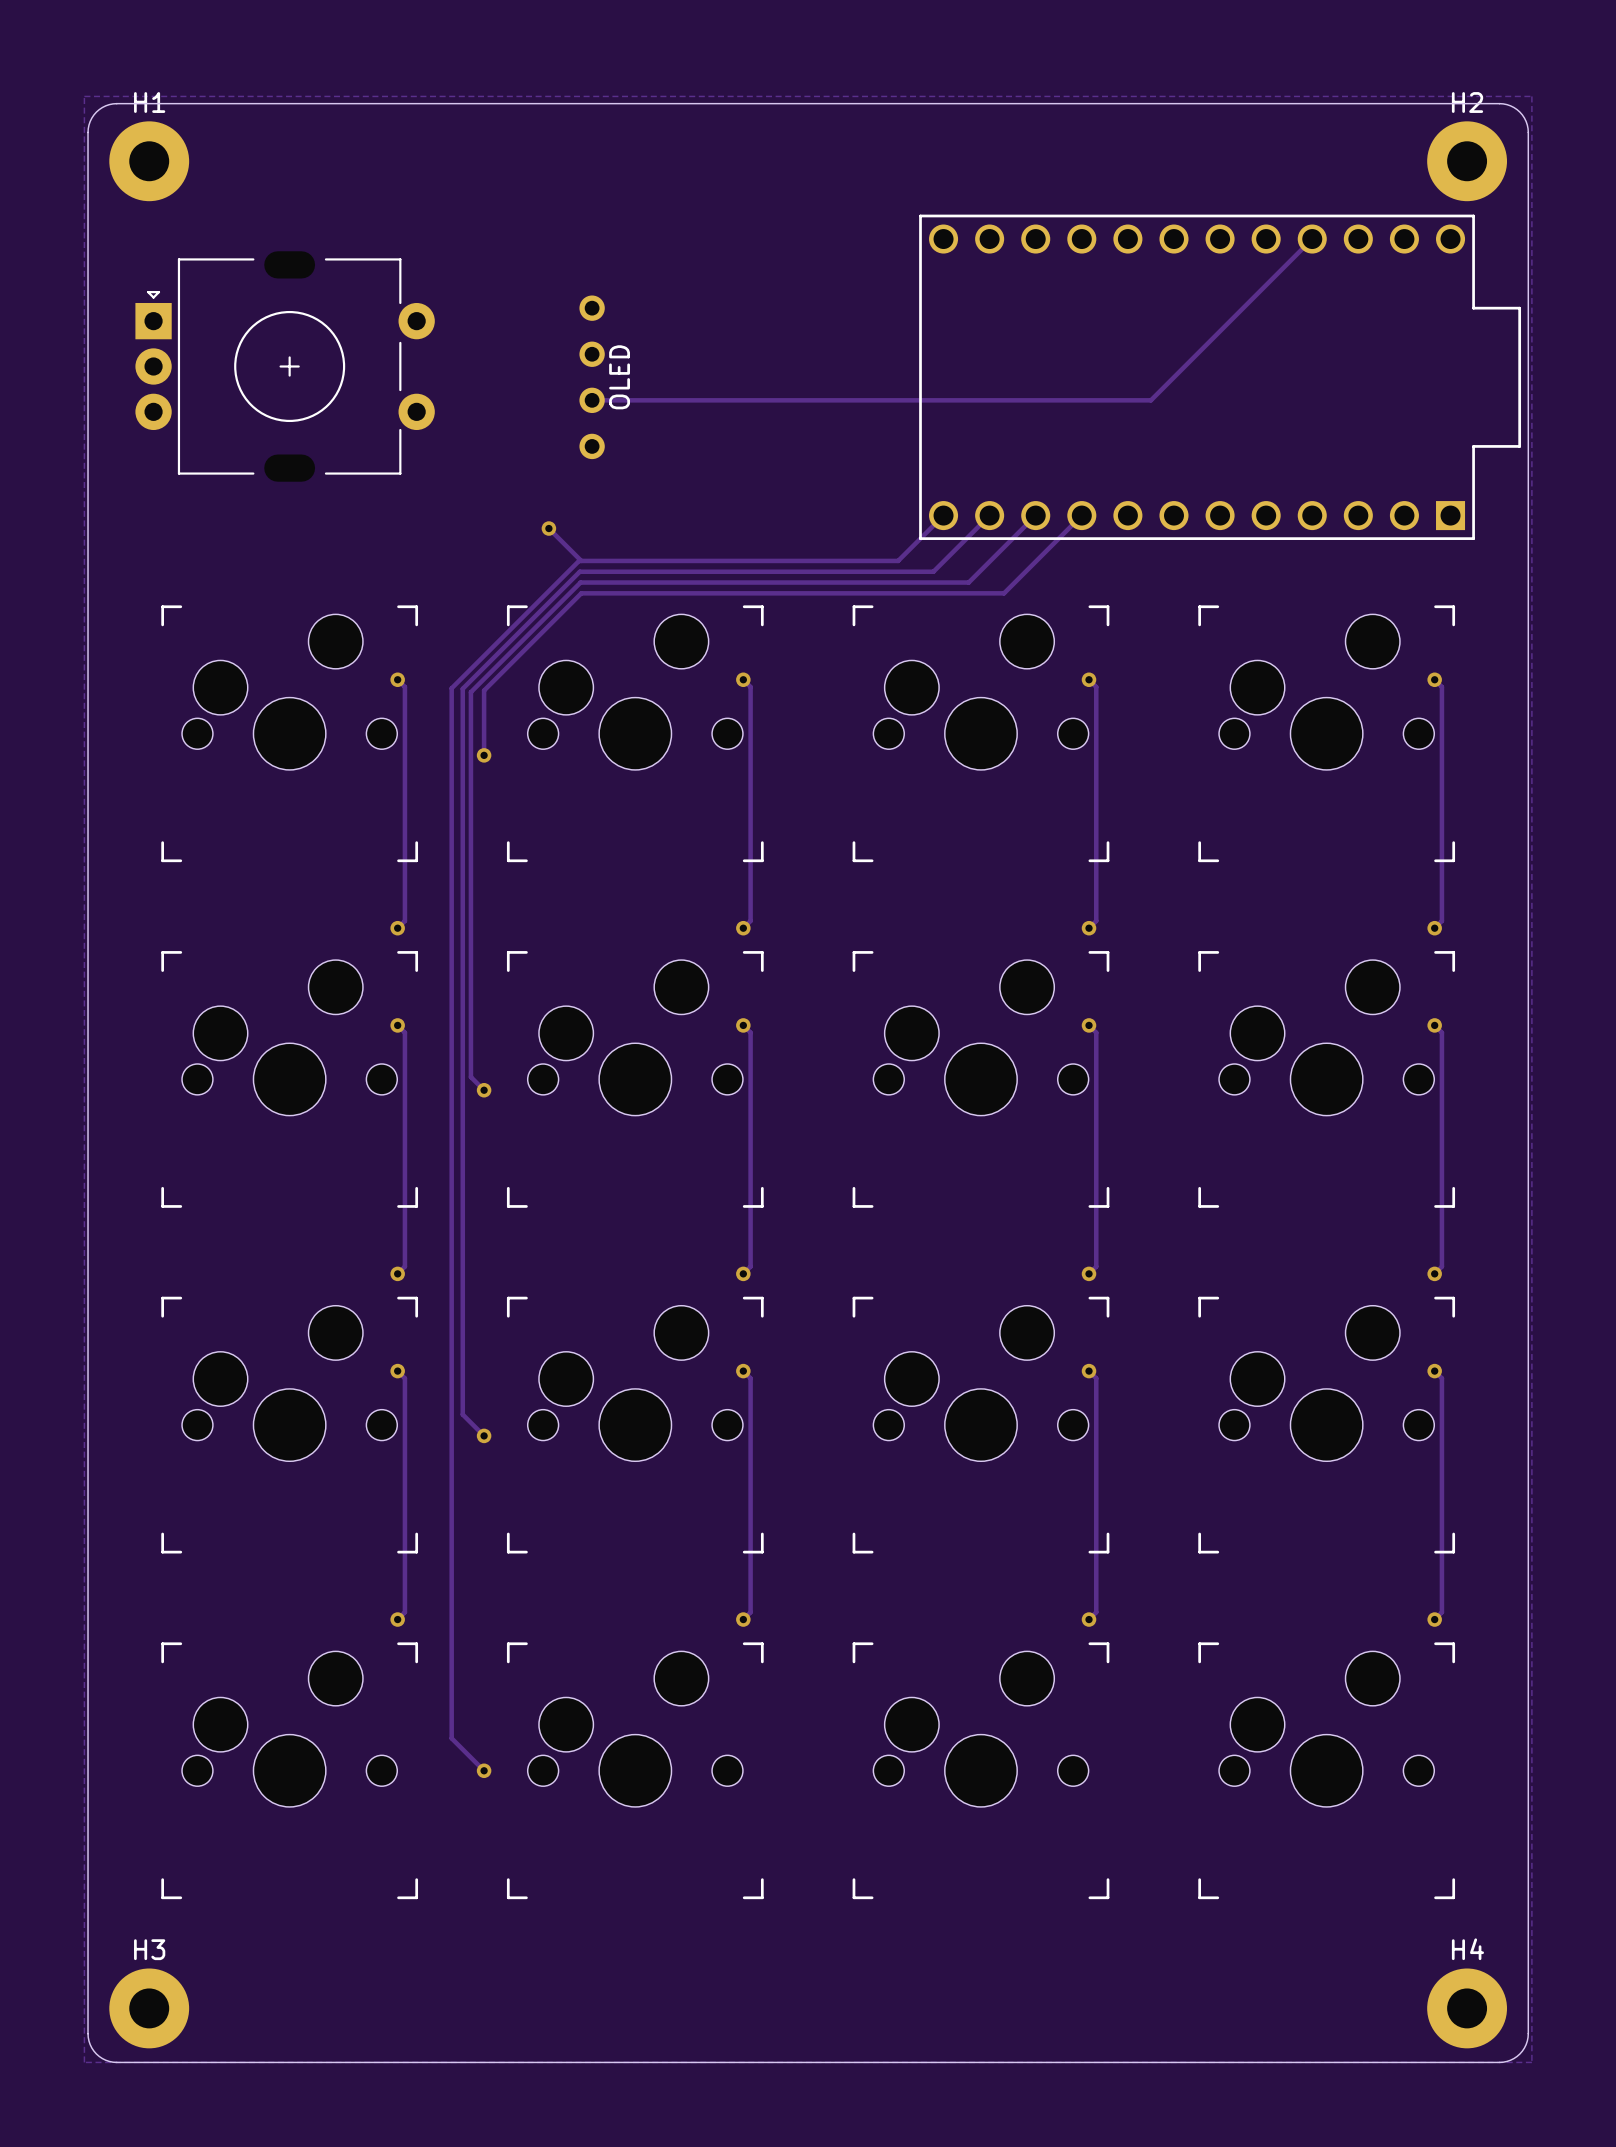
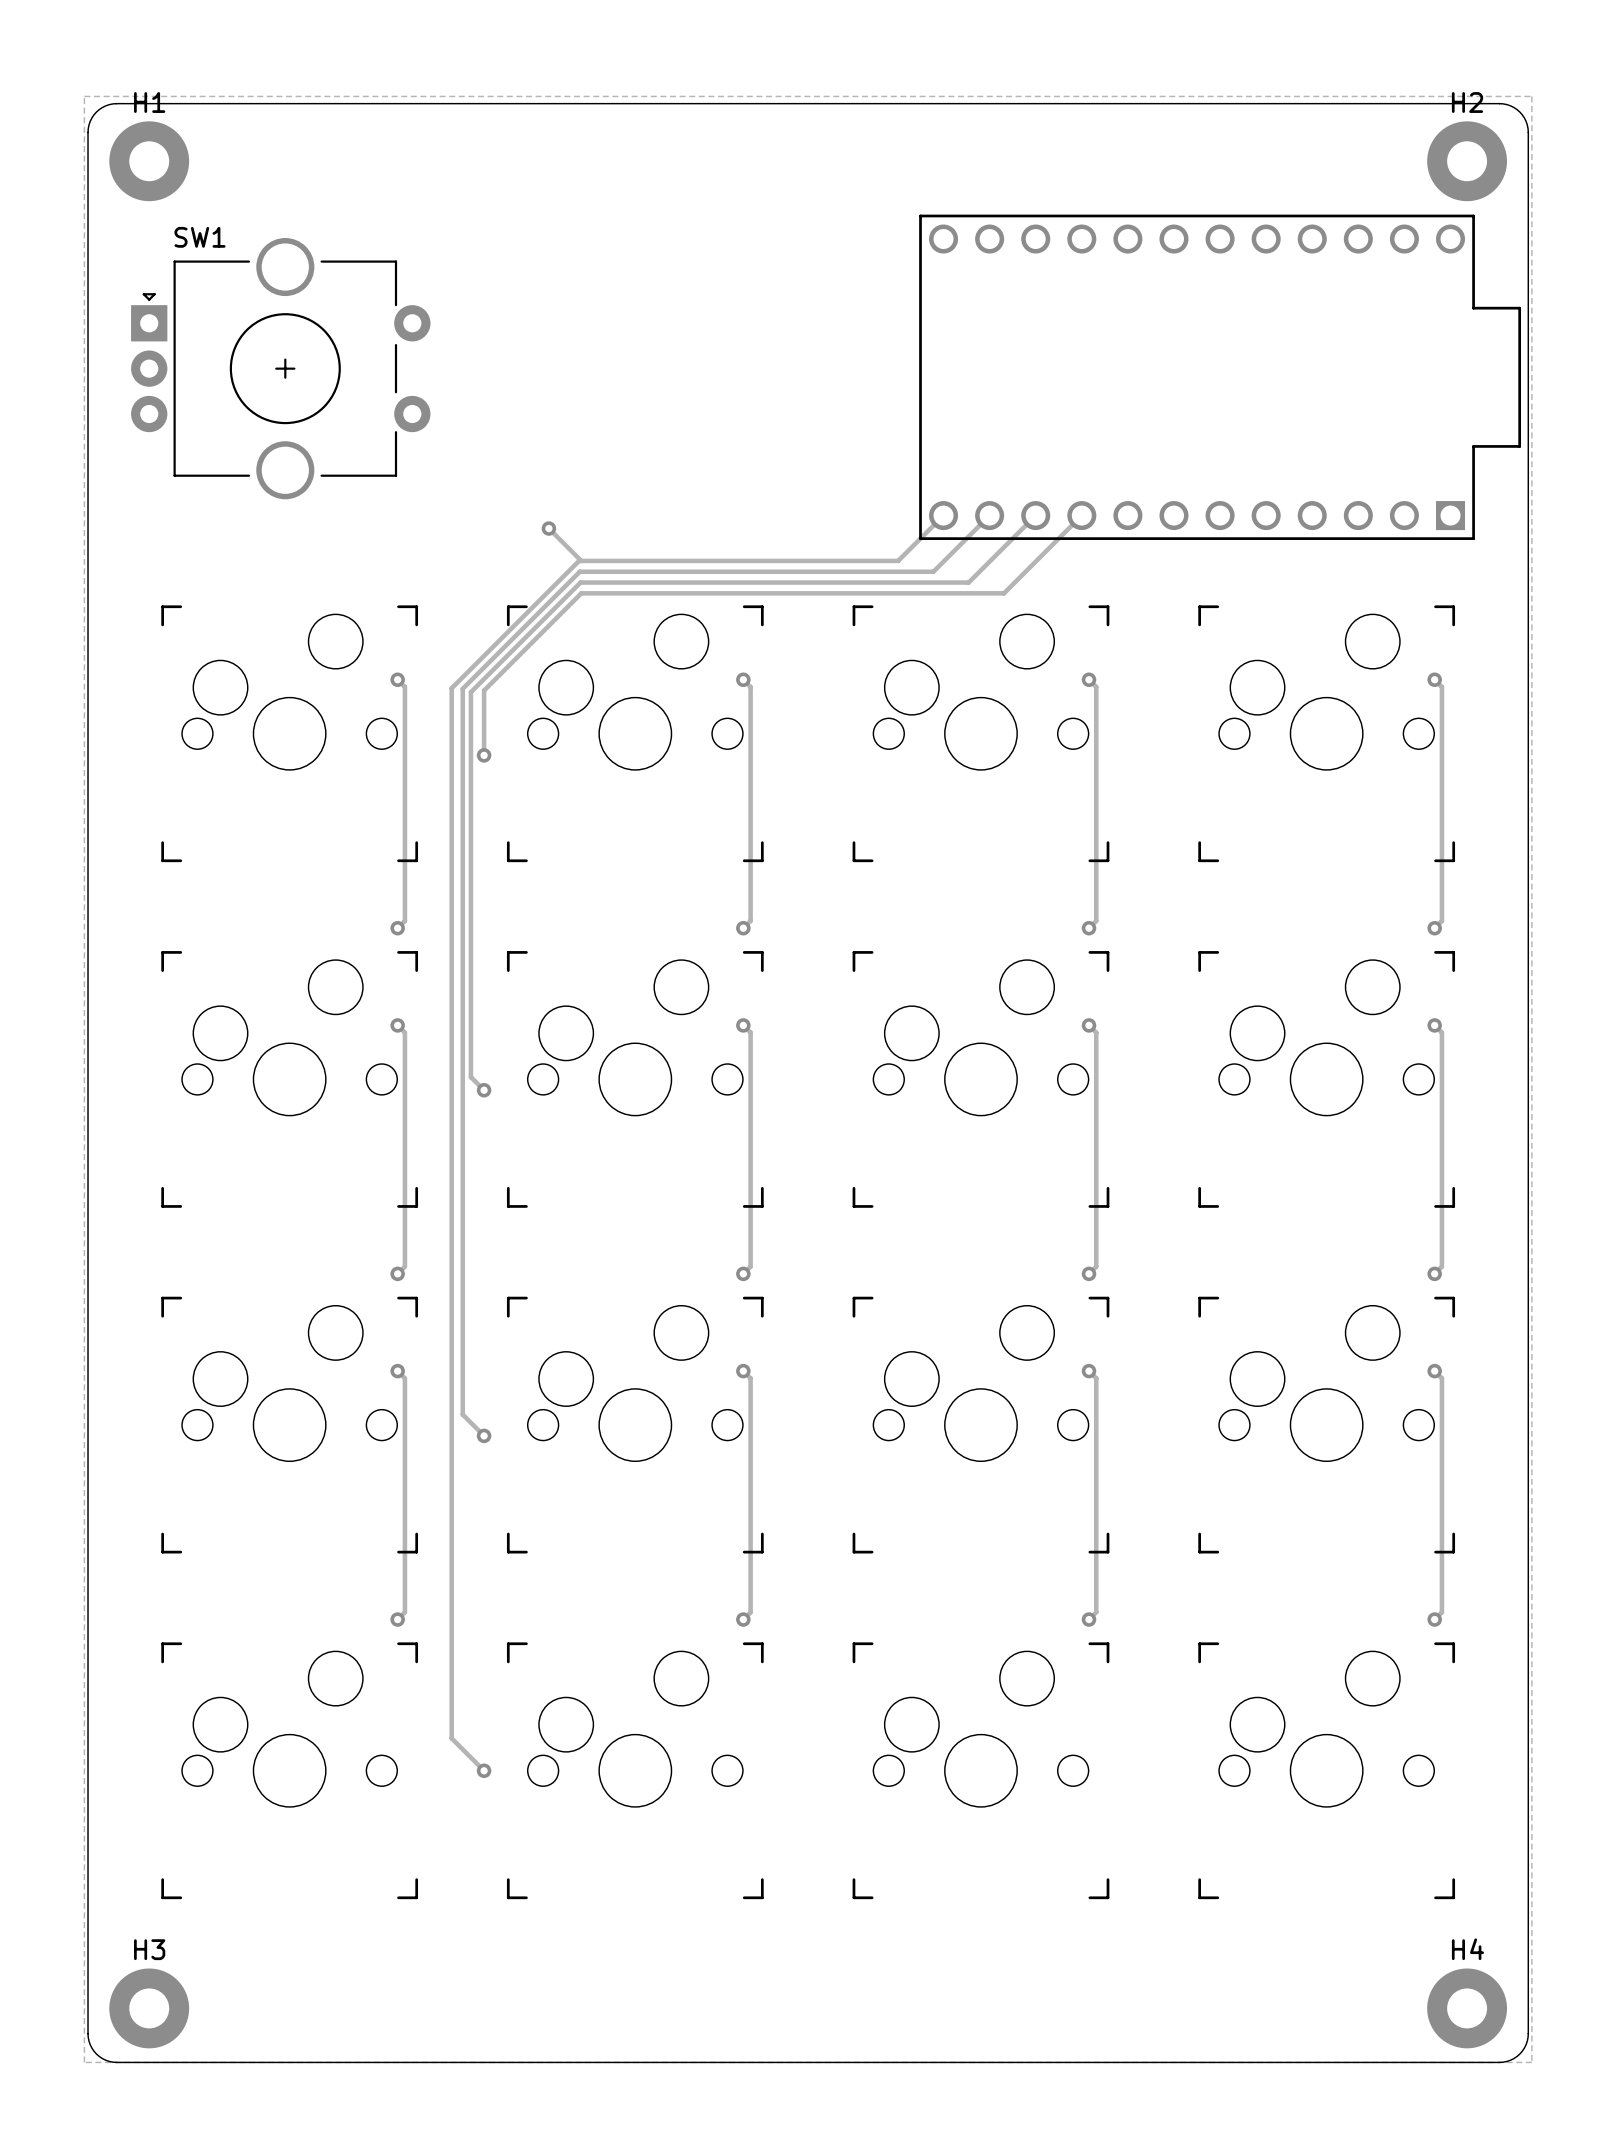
track: (1312, 239) (1150, 400) (592, 400) -> none
part: (285, 366) -> none
SW1: none -> (280, 368)
part: (592, 377) -> none

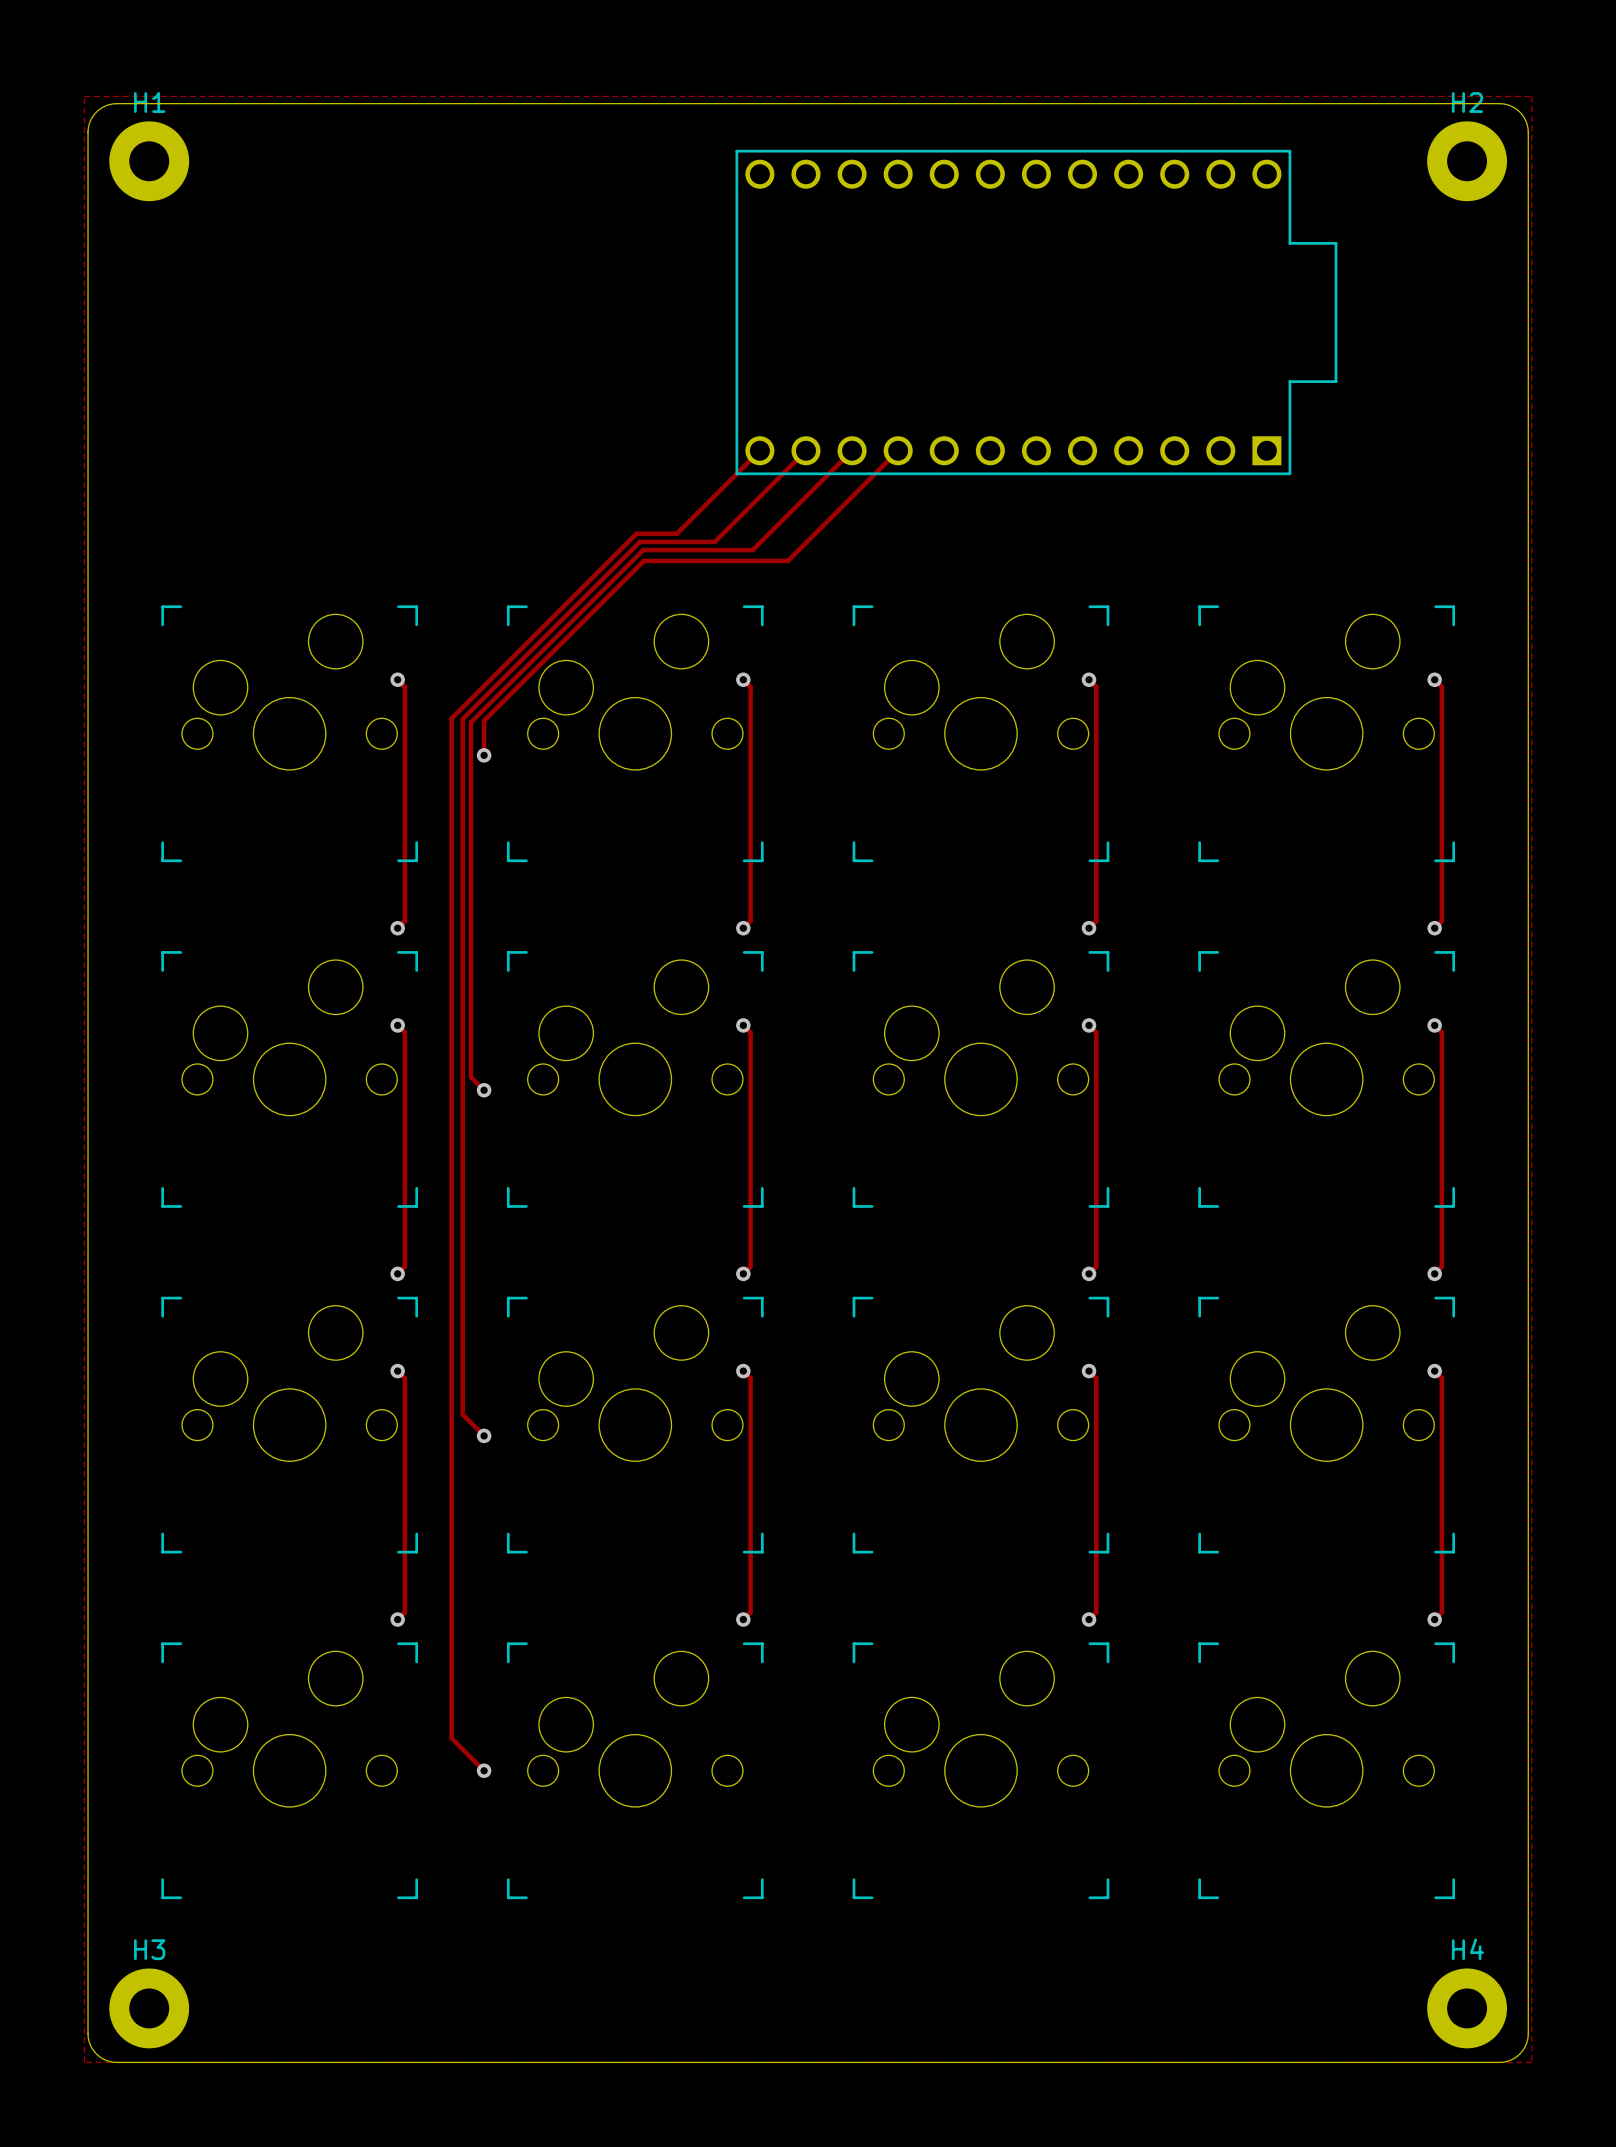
SW1: (280, 368) -> none
part position: (1220, 377) -> (1036, 312)
track: none -> (759, 450) (676, 533) (636, 533) (451, 718)
track: (943, 515) (898, 560) (787, 560) -> (898, 450) (787, 560)
track: (989, 515) (933, 571) (579, 571) (462, 688) (462, 718) -> (805, 450) (714, 541) (639, 541) (462, 718)
track: (1035, 515) (968, 582) (580, 582) (470, 692) (470, 722) -> (852, 450) (752, 550) (643, 550) (470, 722)
track: (1081, 515) (1004, 593) (581, 593) (484, 690) (484, 720) -> none
track: (548, 528) (581, 560) -> none
via: (548, 528) -> none
track: (643, 560) (579, 560) (451, 688) (451, 718) -> (643, 560) (484, 720)

